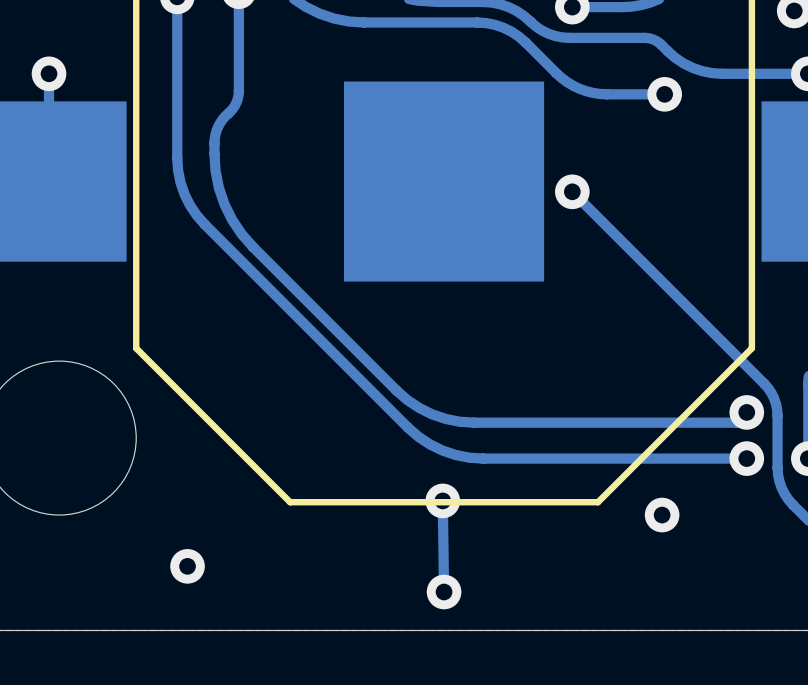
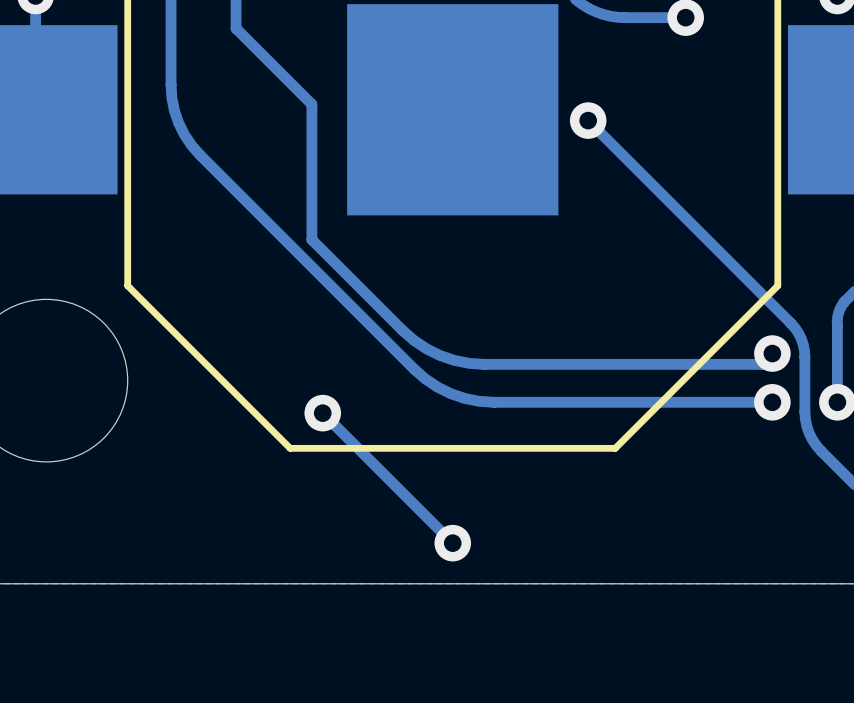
track: (238, 90) (234, 106) (220, 123) (215, 134) (215, 171) (218, 188) (232, 219) (241, 234) (310, 304) -> (236, 14) (236, 28) (311, 104) (311, 239)
via: none -> (322, 413)
track: (442, 500) (444, 592) -> (322, 413) (452, 543)
via: (442, 500) -> none
via: (662, 515) -> none
via: (187, 566) -> none

